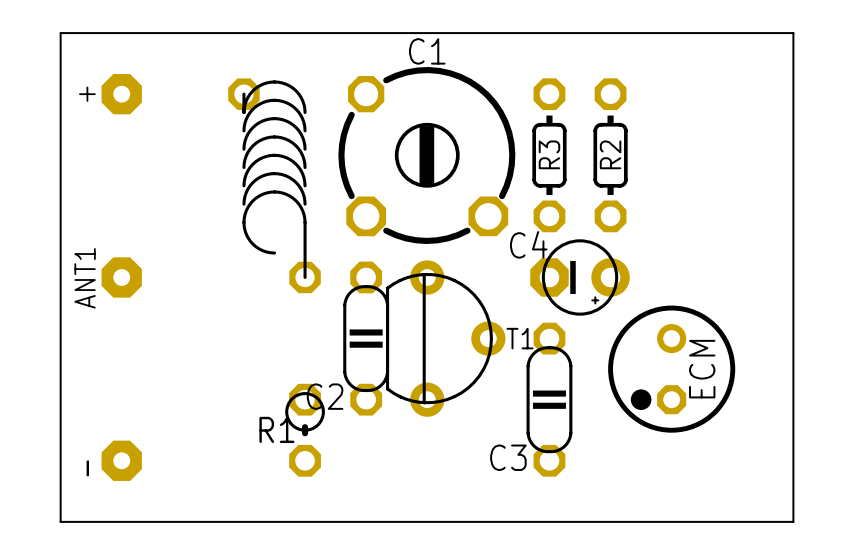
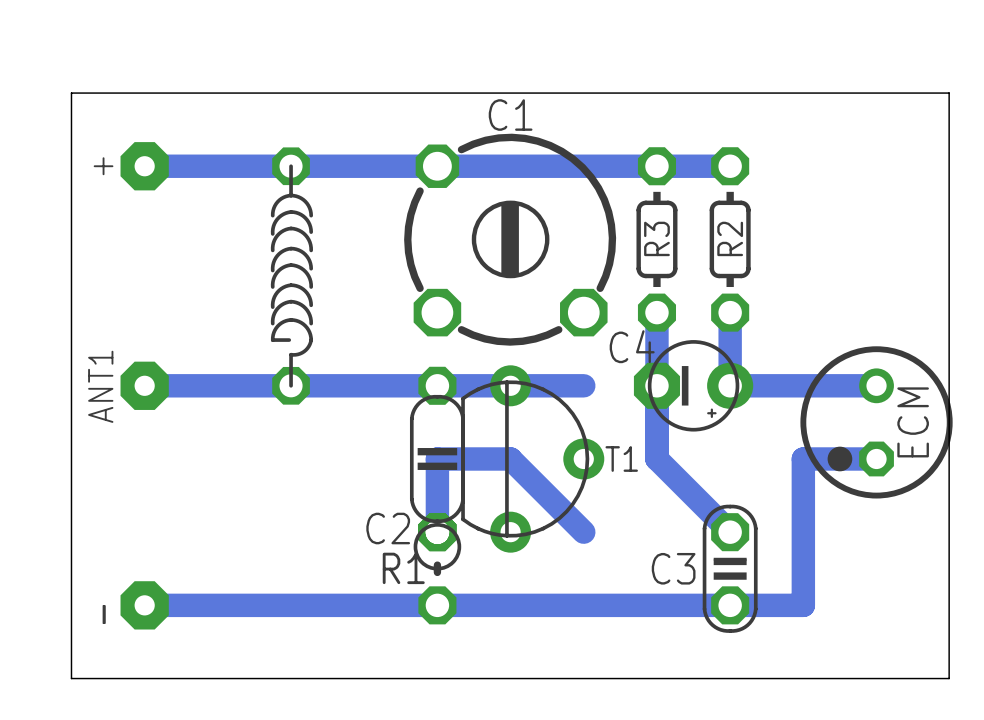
bottom track: none -> (144, 166) (730, 166)
part: none -> (291, 276)
part: (274, 185) -> none
bottom track: none -> (656, 312) (656, 458) (730, 532)
bottom track: none -> (730, 312) (730, 385) (876, 385)
bottom track: none -> (144, 385) (583, 385)
C3 footprint: [526, 322, 573, 477] -> [702, 504, 758, 633]
bottom track: none -> (876, 458) (803, 458) (803, 605) (144, 605)
ECM position: (671, 369) -> (876, 422)
bottom track: none -> (437, 532) (437, 458) (510, 458) (583, 532)
R1 position: (305, 430) -> (437, 568)
C3 name position: C3 (508, 457) -> C3 (673, 568)

